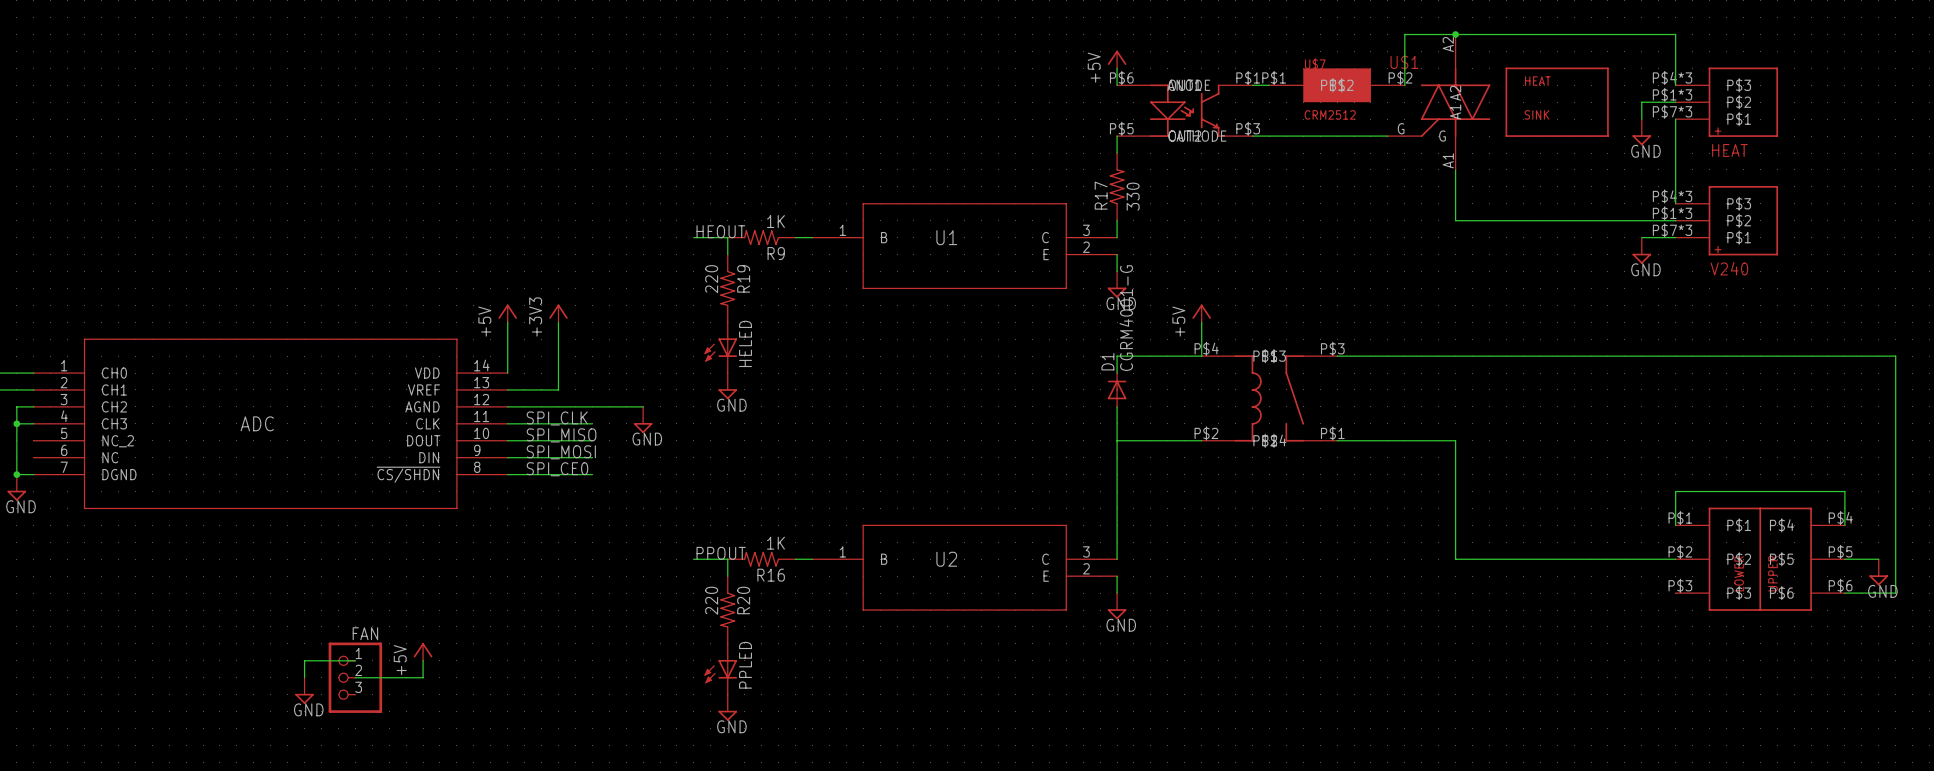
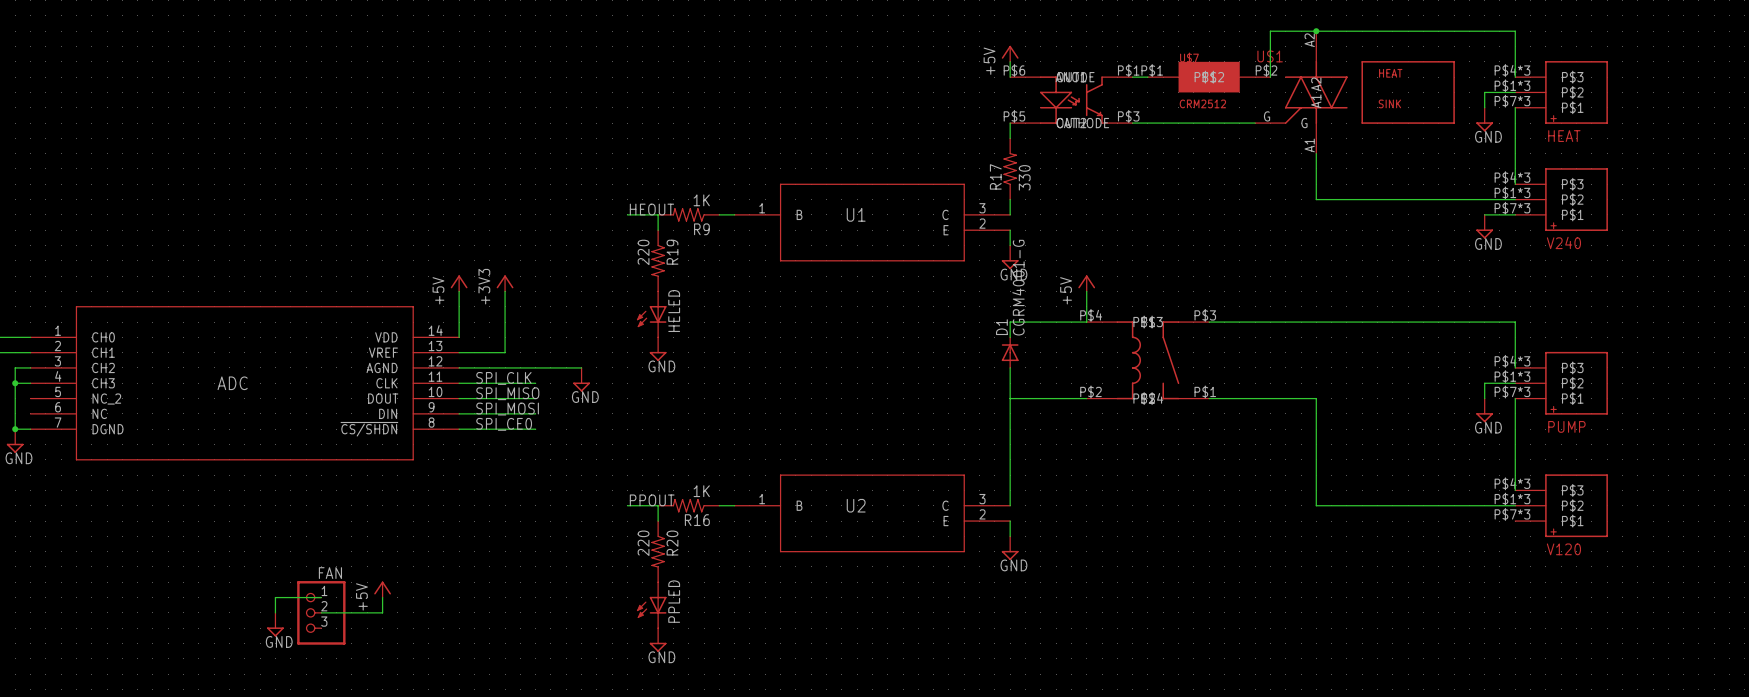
wire: (1675, 356) (1895, 356) (1895, 593) (1844, 593) -> (1515, 322) (1515, 367)
wire: none -> (1515, 383) (1484, 383) (1484, 398)
PUMP: none -> (1561, 383)
power symbol: none -> GND (1484, 410)
wire: (1675, 491) (1844, 491) (1844, 525) -> (1515, 444) (1515, 398)
wire: none -> (1515, 475) (1515, 490)
V120: none -> (1561, 505)
part: (1760, 559) -> none
wire: (1844, 559) (1878, 559) -> none
power symbol: GND (1878, 572) -> none

